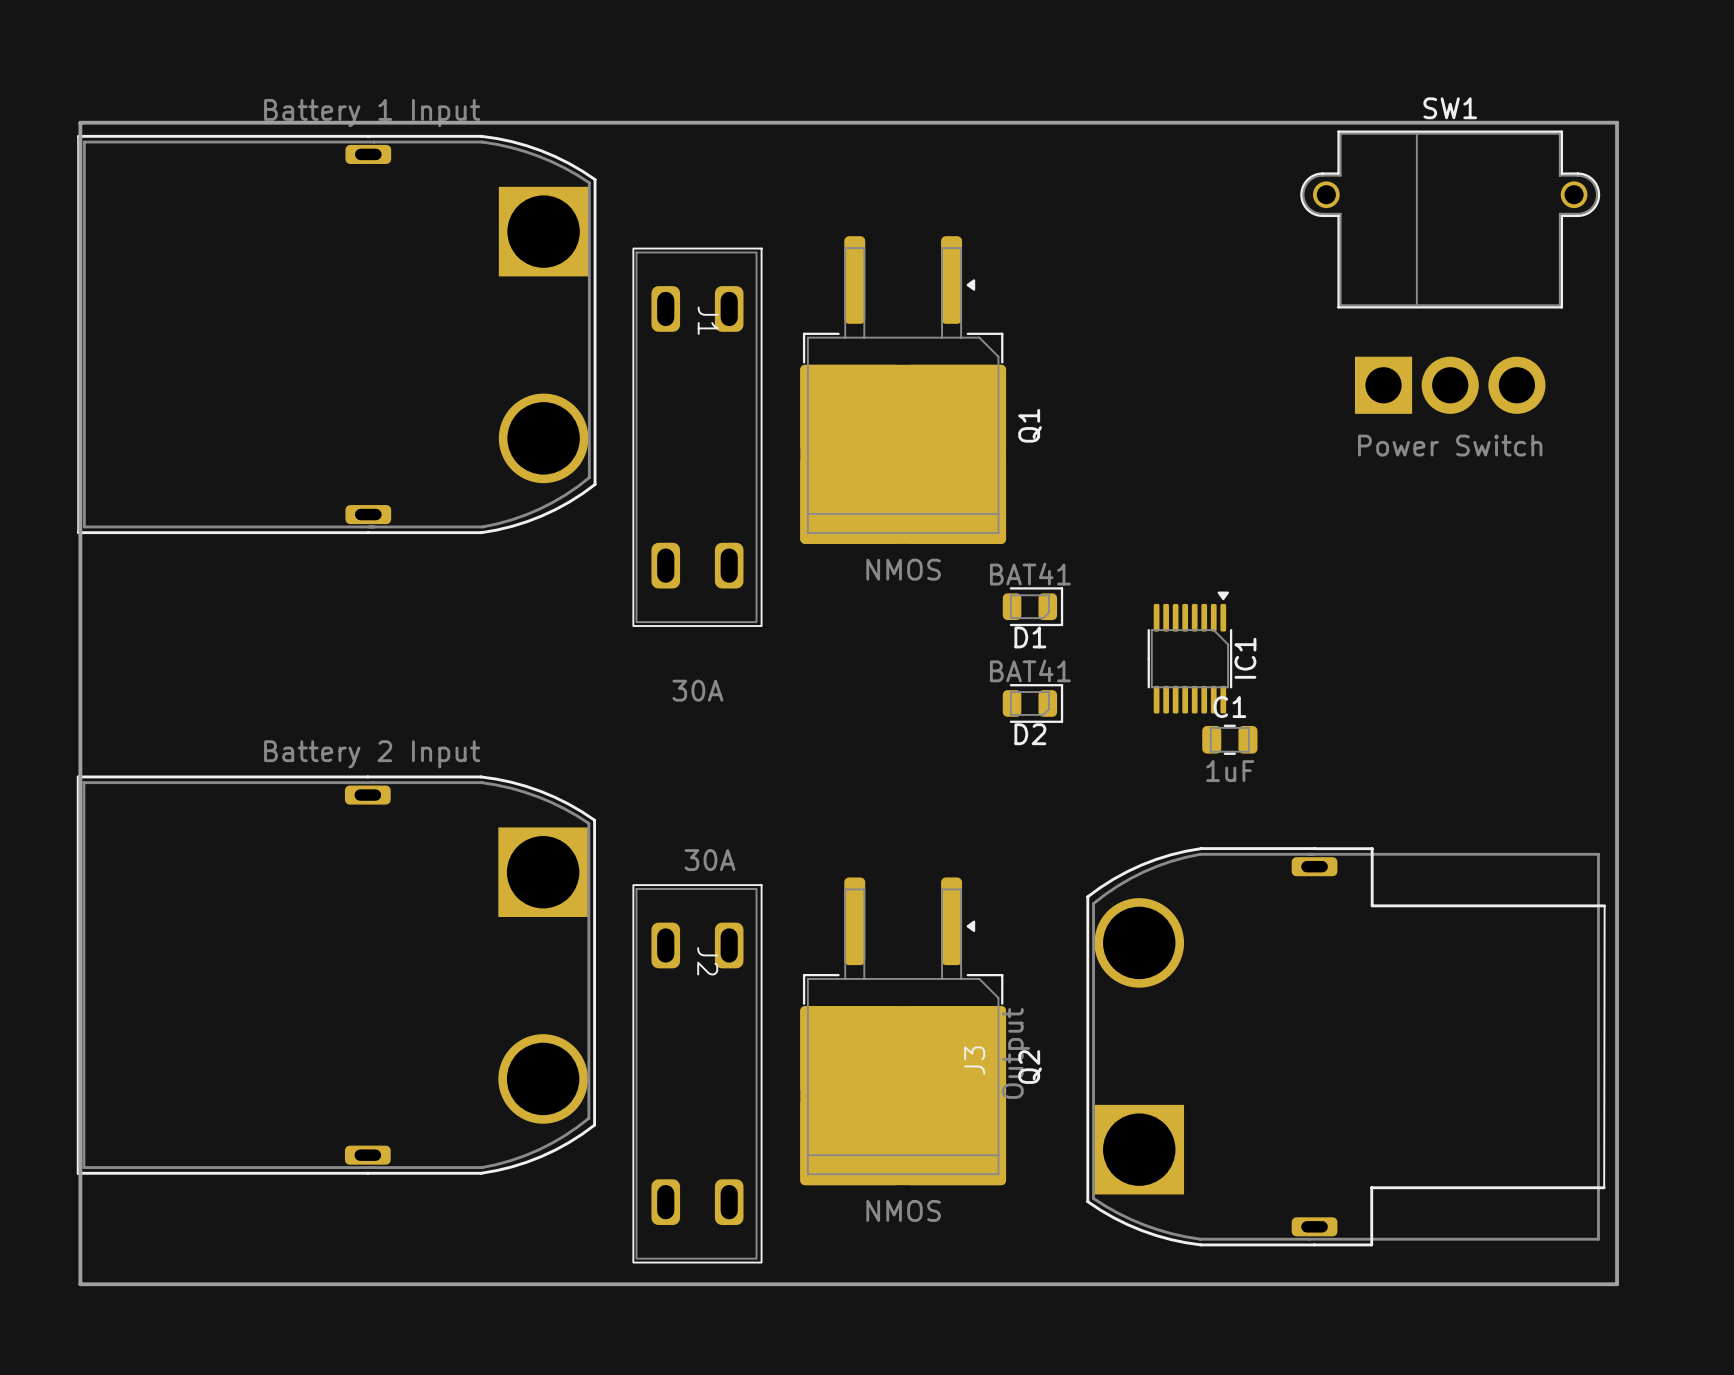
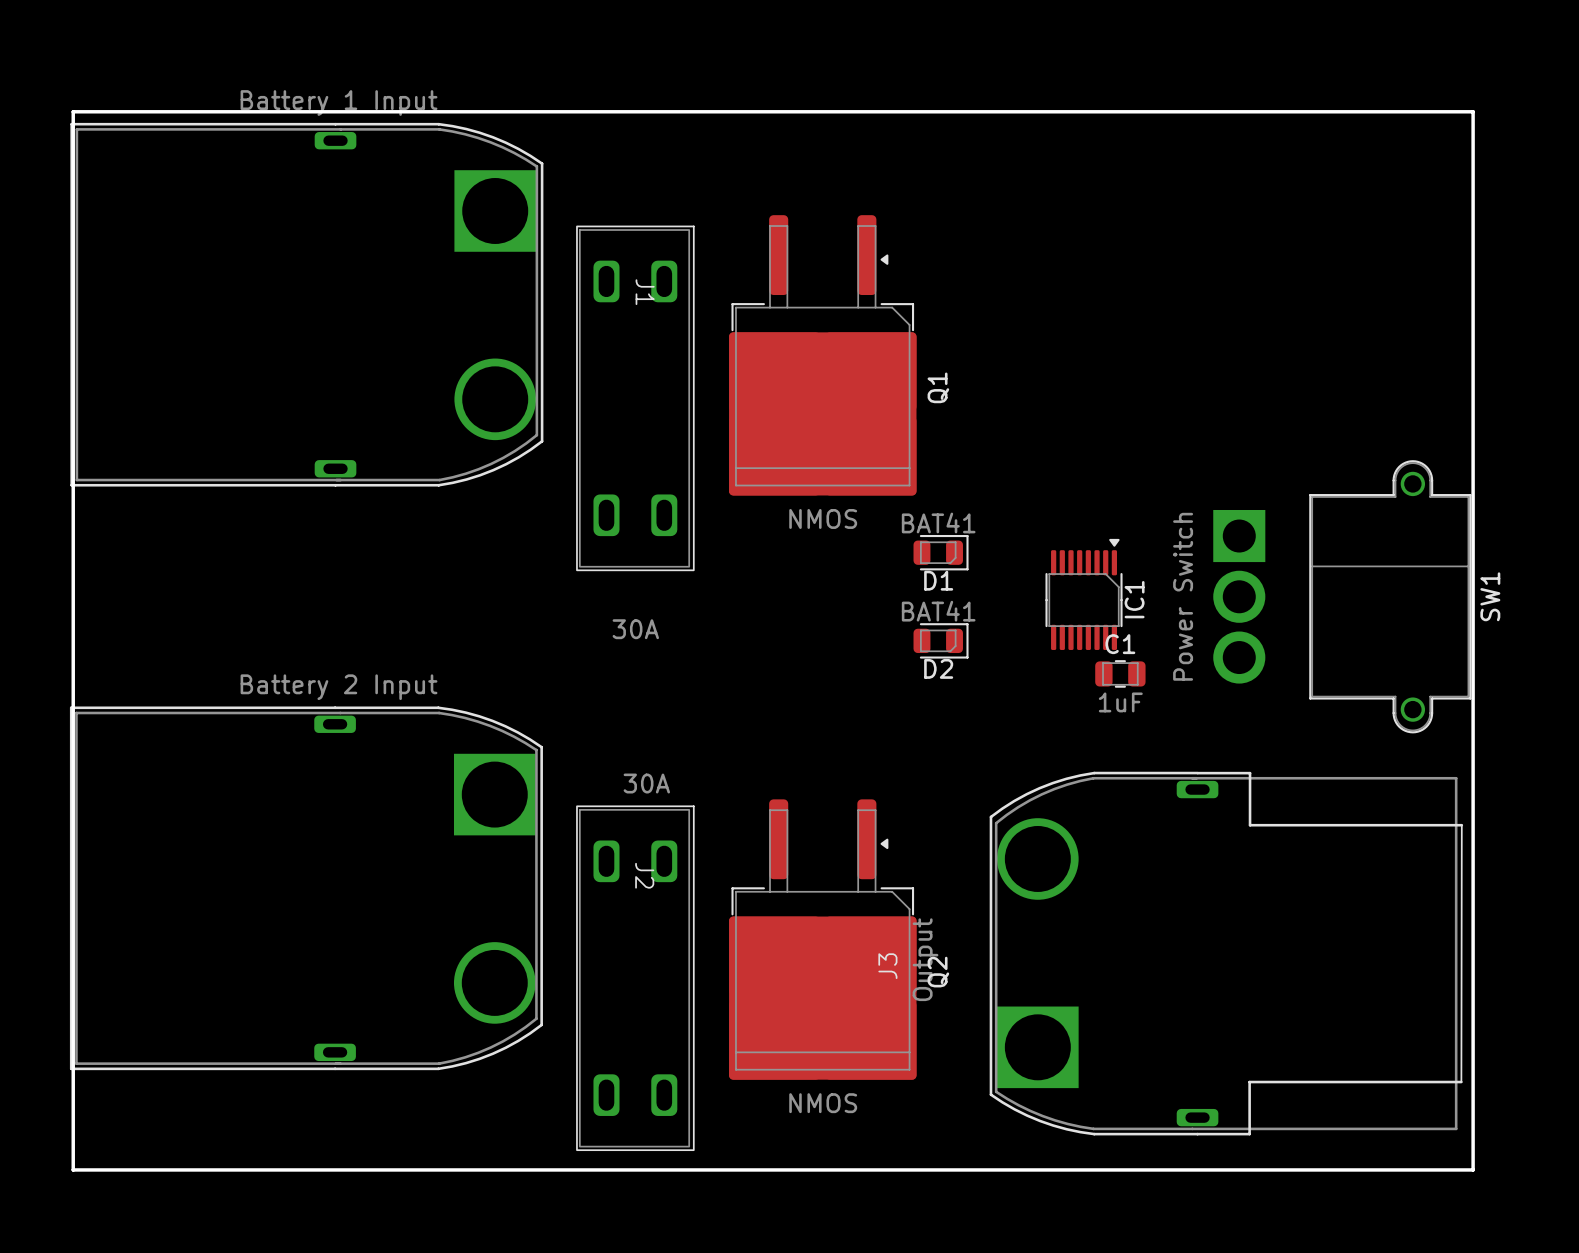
SW1 rotation: 0° (1450, 272) -> 90° clockwise (1342, 596)
SW1 position: (1450, 272) -> (1342, 596)

